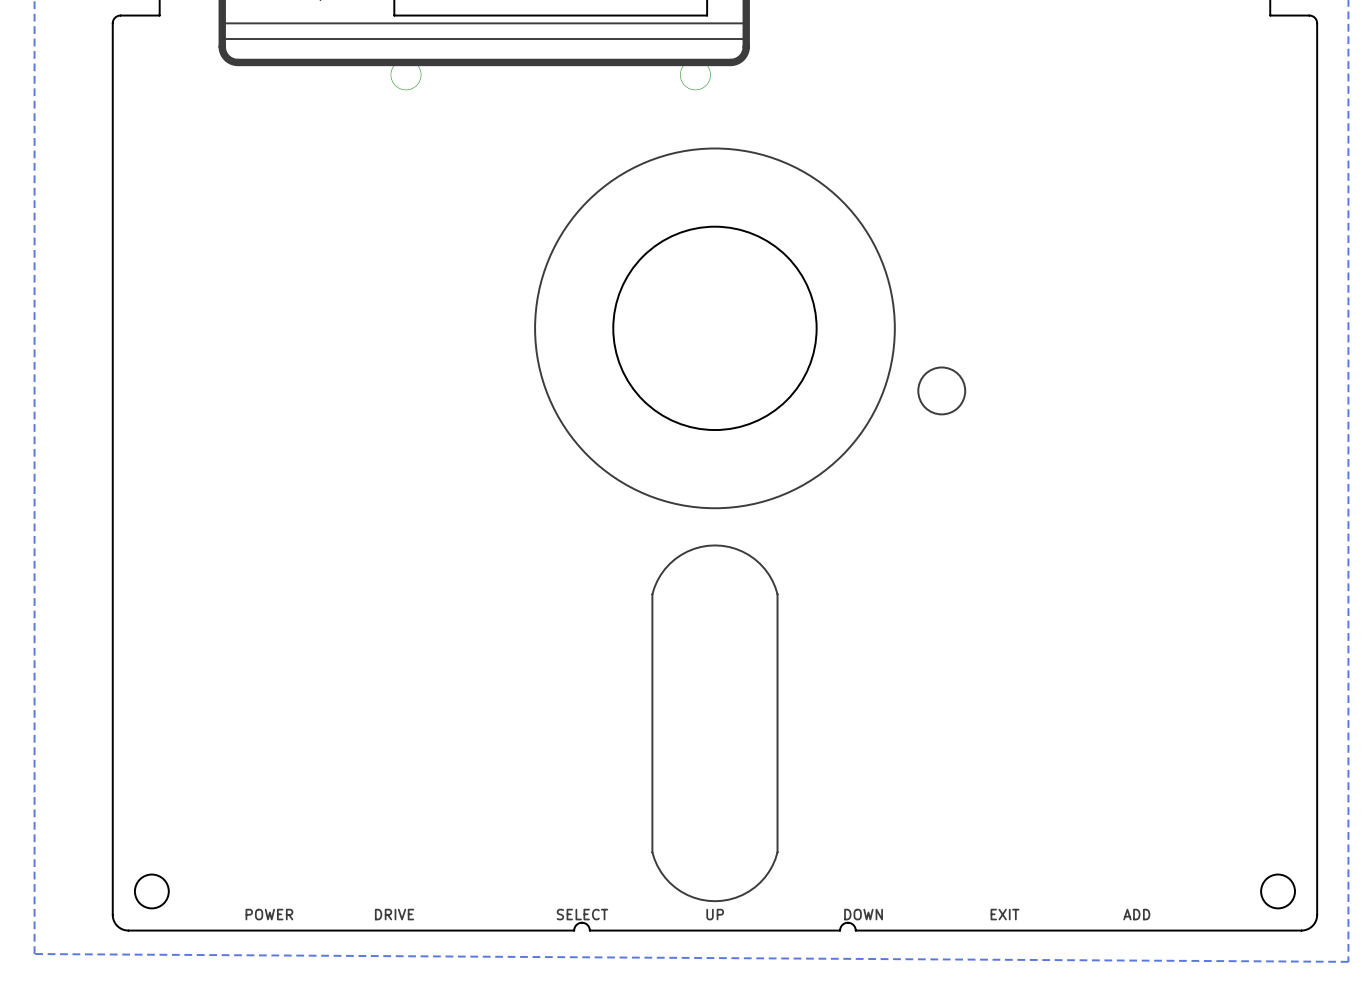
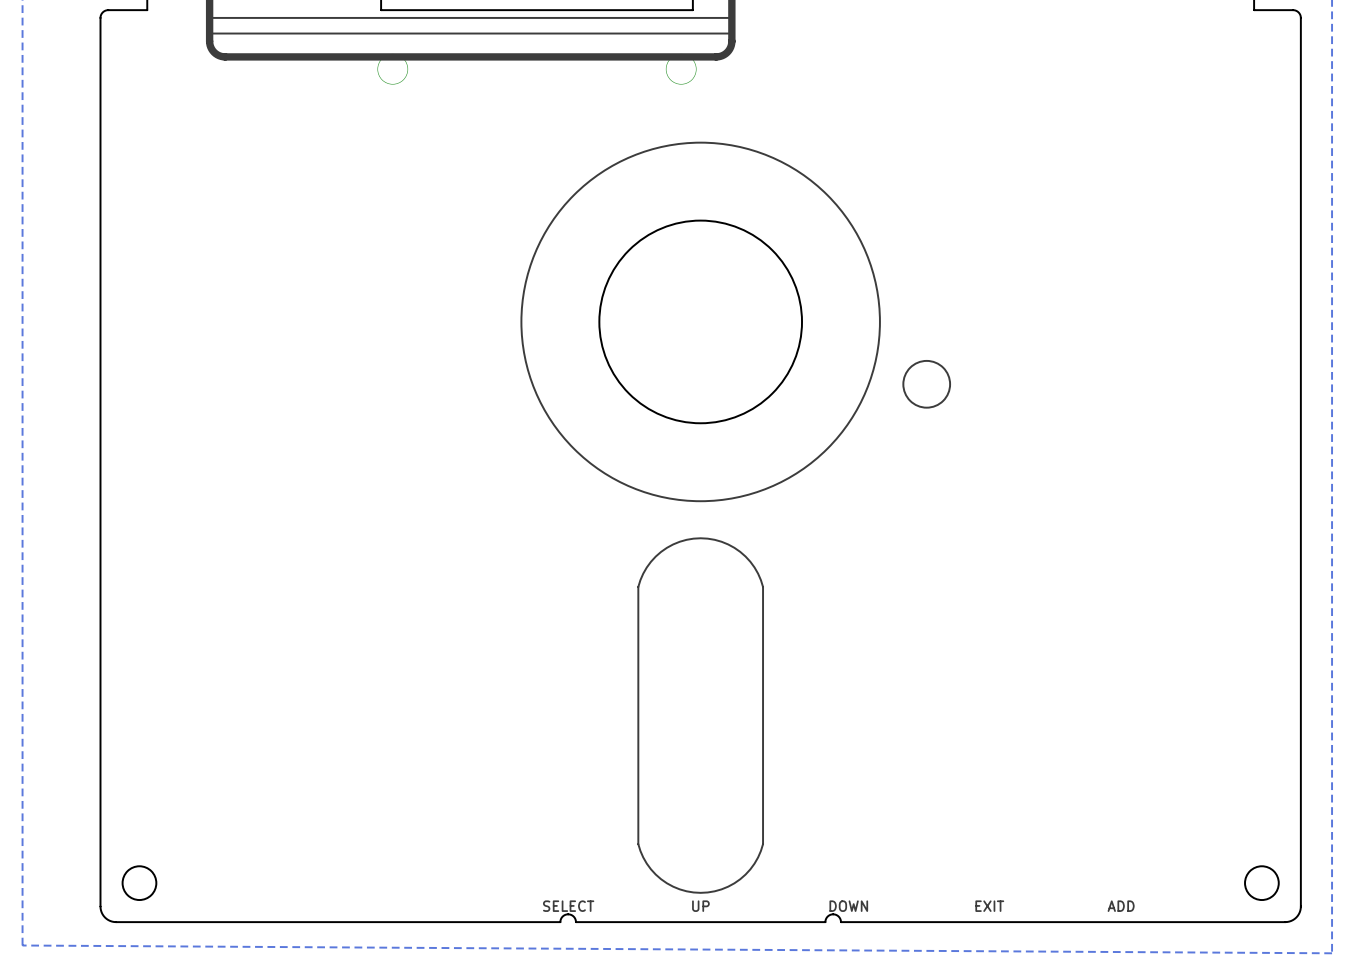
text: POWER (269, 914) -> none
text: DRIVE (394, 914) -> none

